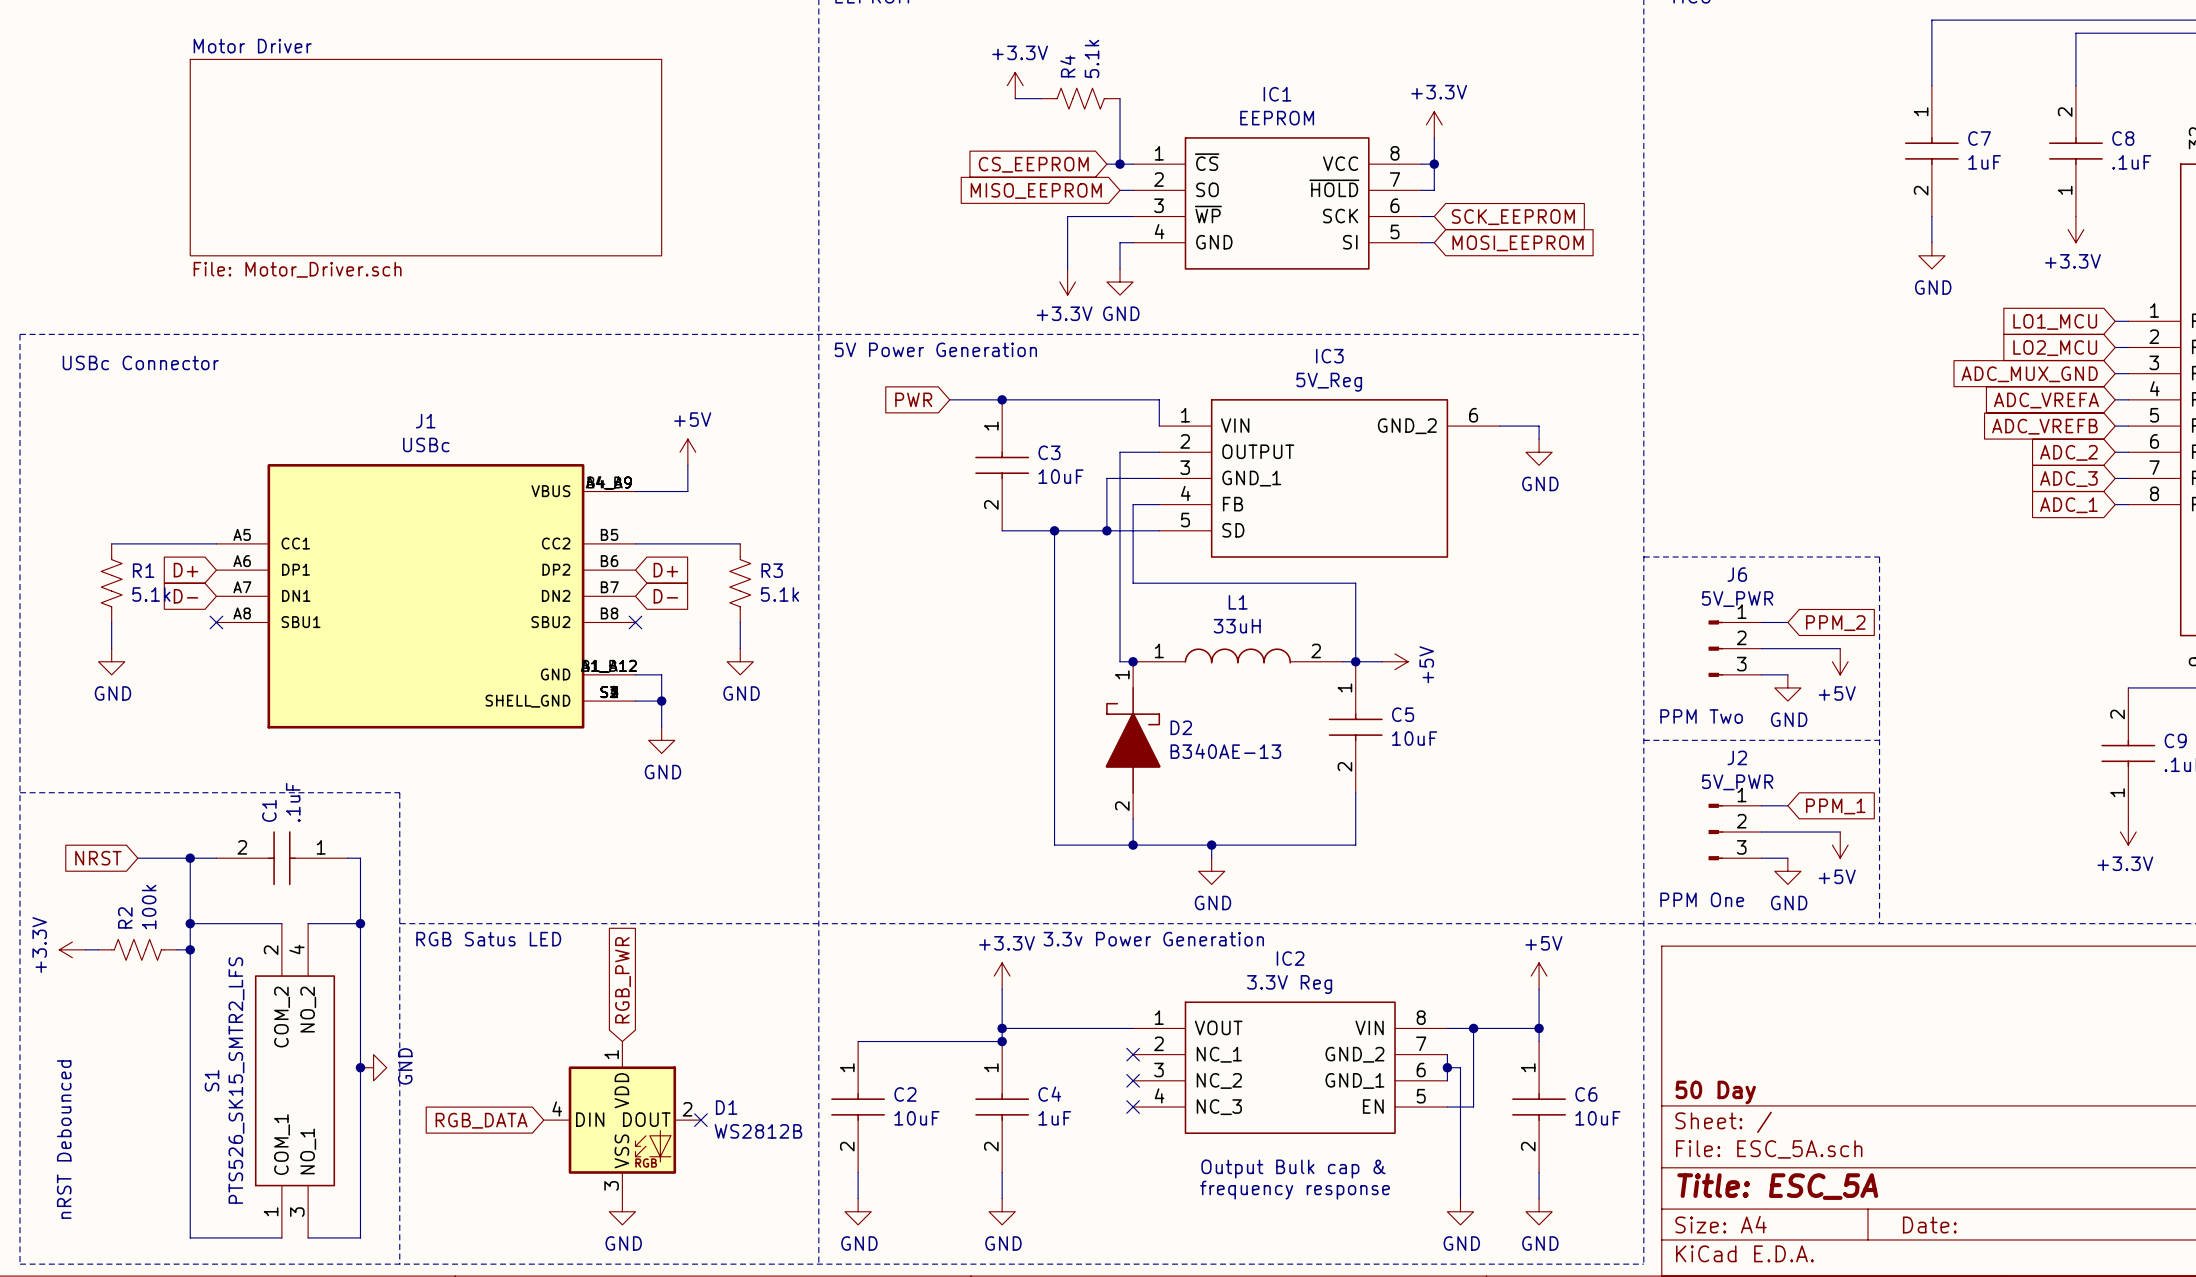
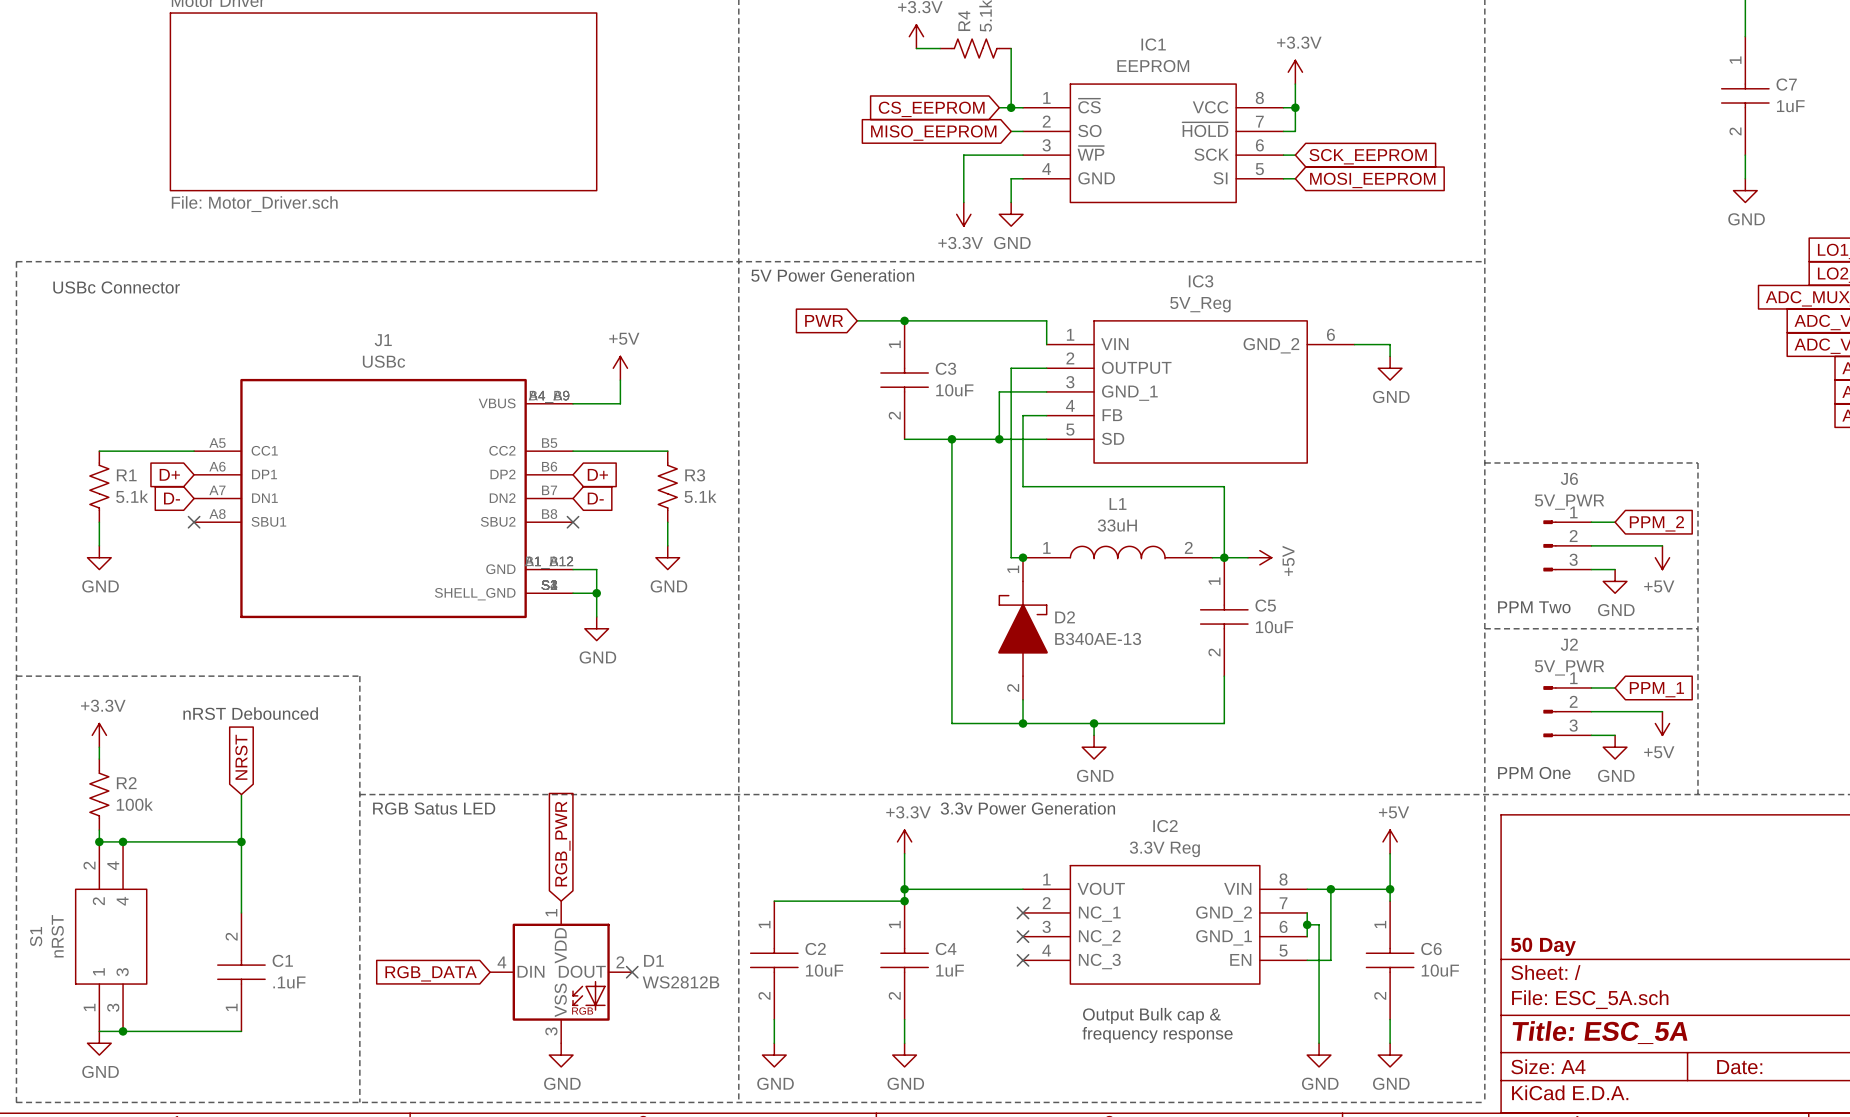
text: none -> nRST Debounced (250, 713)
global label rotation: 0° (98, 858) -> 90° clockwise (241, 757)
global label position: NRST (98, 858) -> NRST (241, 757)
wire: (137, 858) (216, 858) -> none
wire: (190, 858) (190, 1237) (281, 1237) -> none
junction: (190, 858) -> none
C1 rotation: 0° (281, 858) -> 90° clockwise (241, 972)
C1 position: (281, 858) -> (241, 972)
wire: (347, 858) (360, 858) (360, 1237) (308, 1237) -> none
wire: none -> (99, 747) (99, 759)
wire: (190, 923) (281, 923) -> none
junction: (190, 923) -> none
S1 symbol: [254, 923, 336, 1238] -> [74, 841, 148, 1032]
wire: none -> (241, 794) (241, 912)
wire: (308, 923) (360, 923) -> none
junction: (360, 923) -> none
power symbol rotation: 0° (72, 949) -> 90° clockwise (99, 735)
power symbol position: +3.3V (72, 949) -> +3.3V (99, 735)
wire: (85, 949) (98, 949) -> none
R2 rotation: 0° (137, 949) -> 90° clockwise (99, 794)
wire: (177, 949) (190, 949) -> none
junction: (190, 949) -> none
wire: none -> (99, 830) (99, 841) (241, 841)
junction: none -> (99, 841)
junction: none -> (123, 841)
junction: none -> (241, 841)
junction: (360, 1067) -> none
power symbol: GND (373, 1067) -> none
S1 value: PTS526_SK15_SMTR2_LFS (236, 1080) -> nRST (57, 936)
text: nRST Debounced (64, 1139) -> none
wire: none -> (99, 1031) (241, 1031)
junction: none -> (123, 1031)
power symbol: none -> GND (99, 1043)

